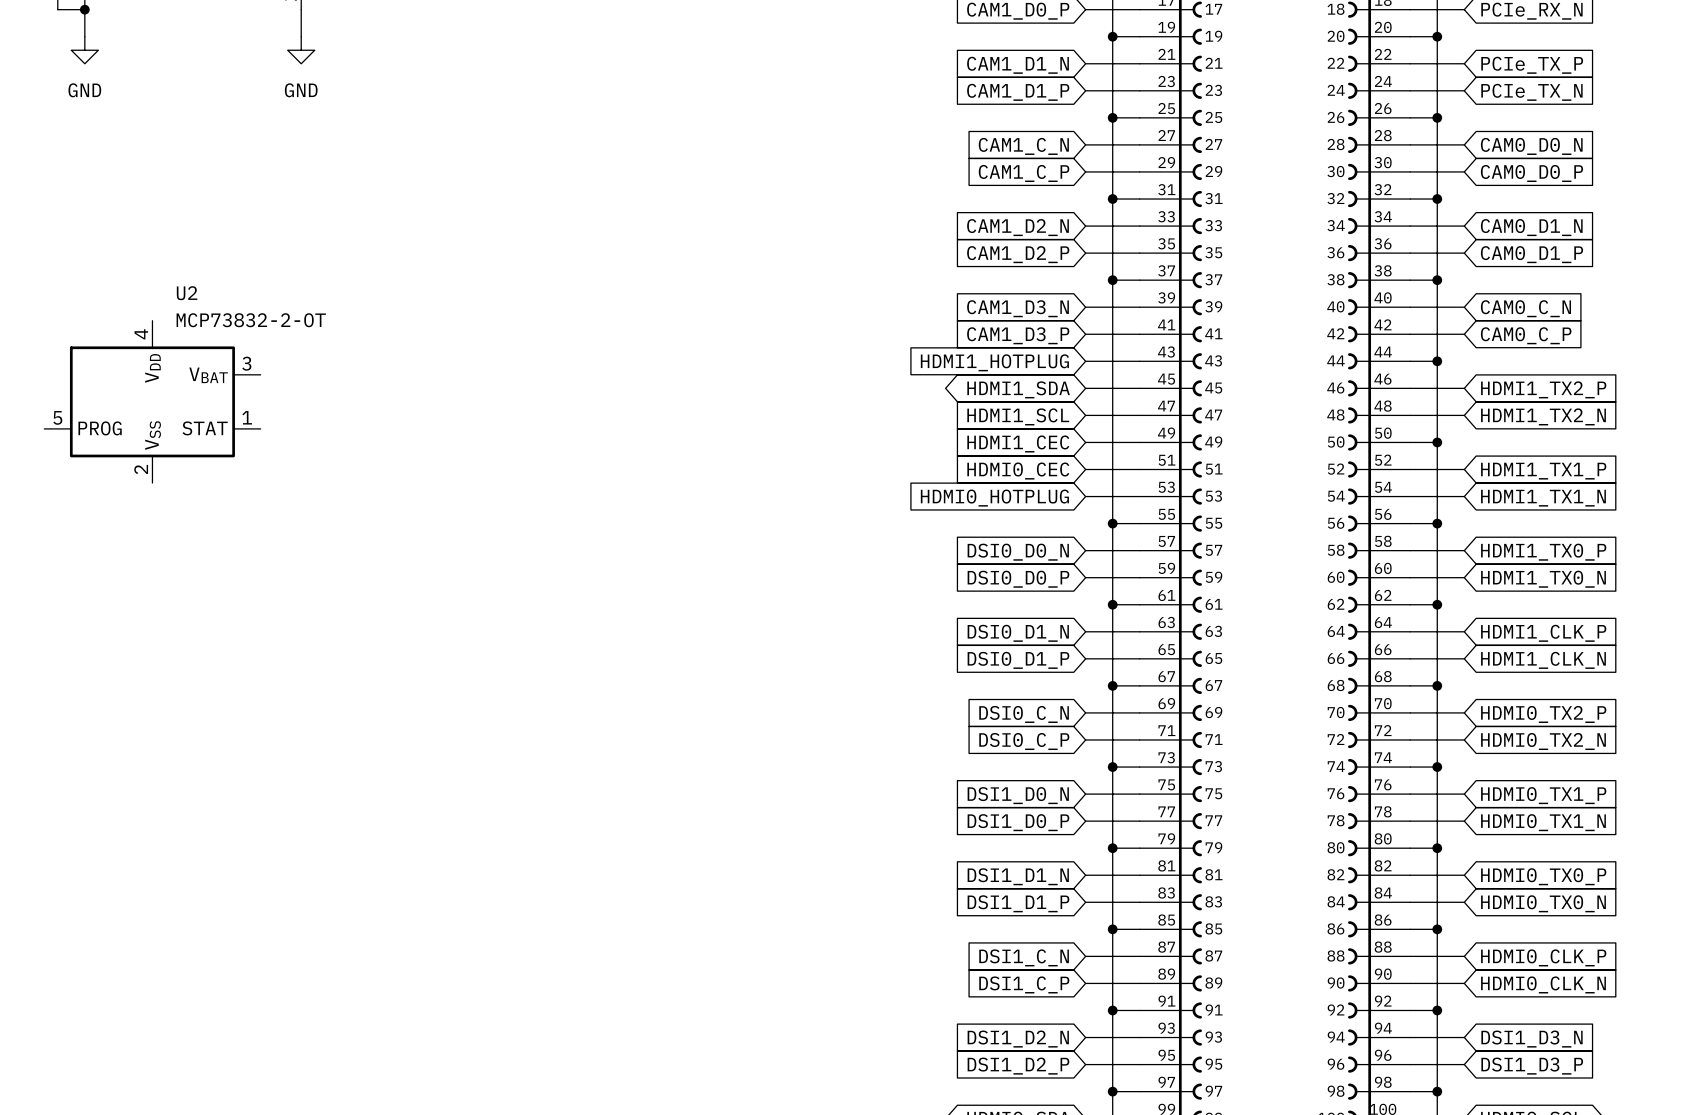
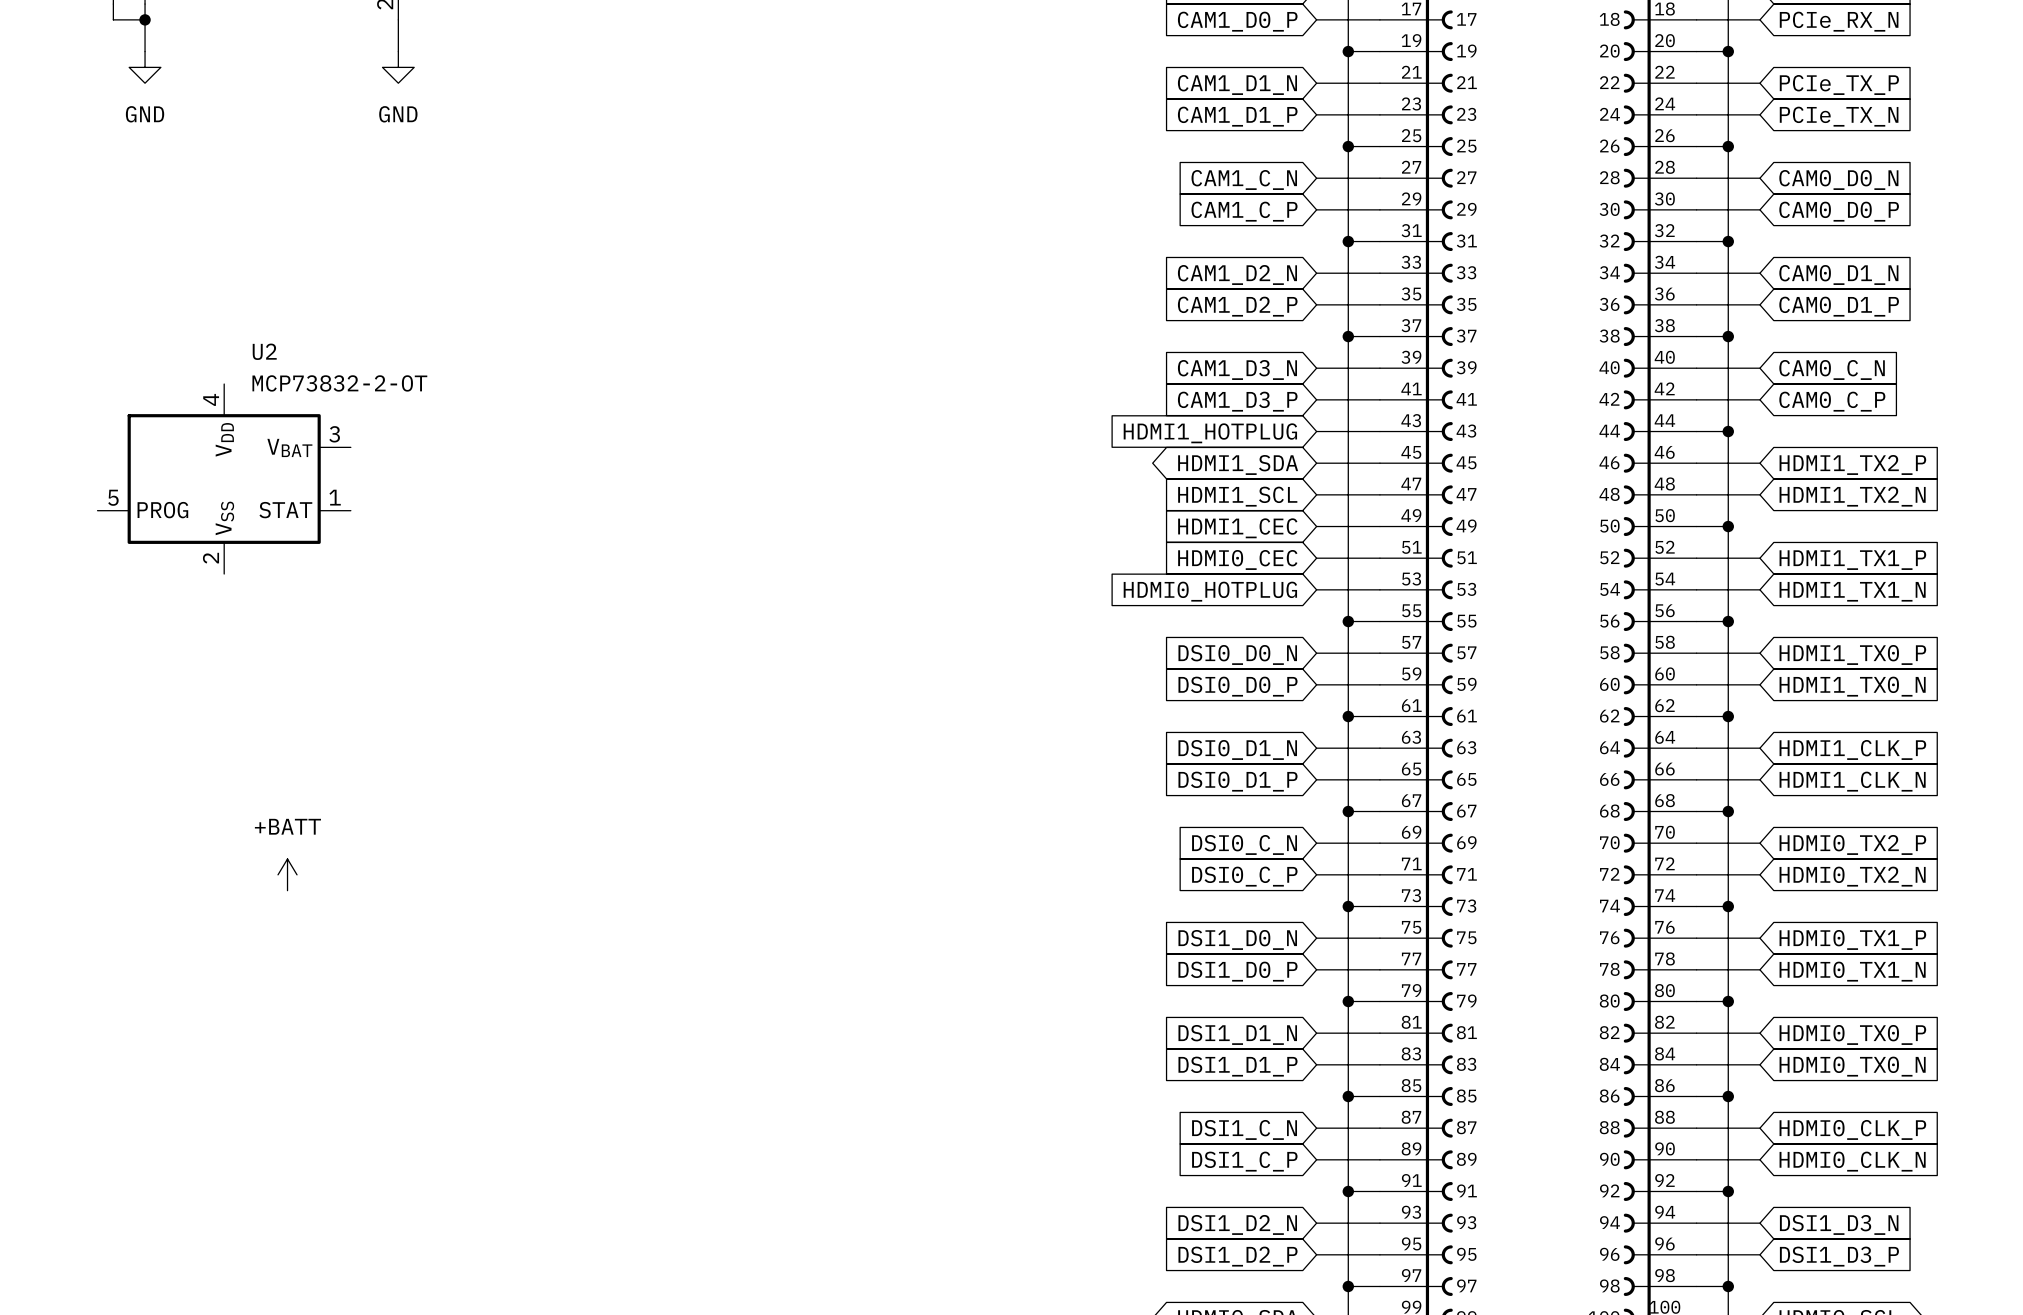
power symbol: none -> +BATT (287, 874)

